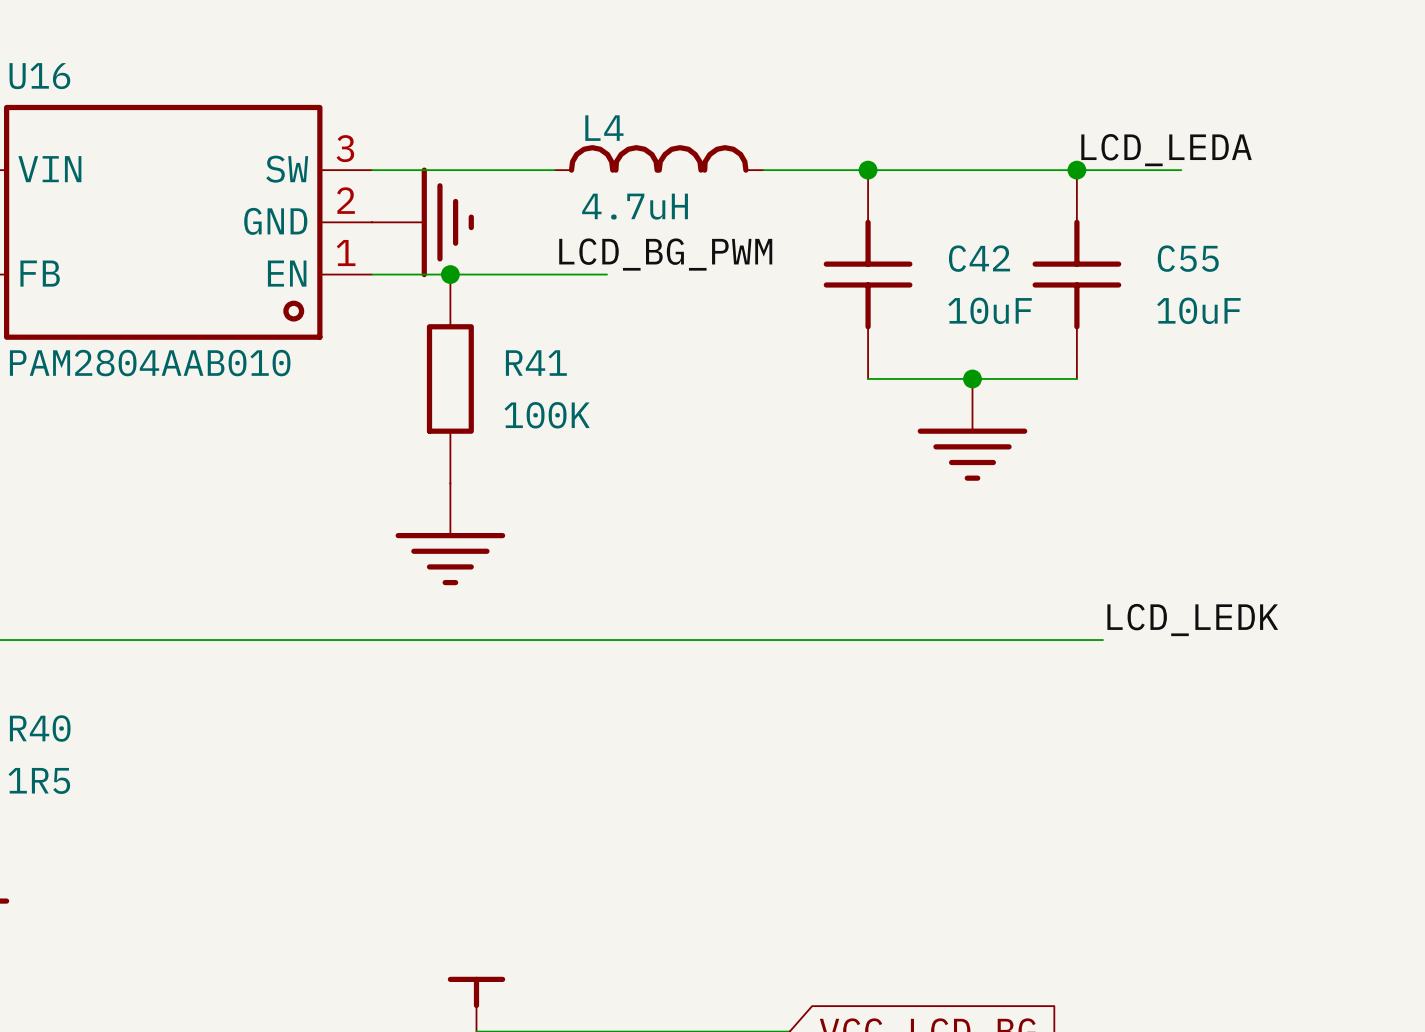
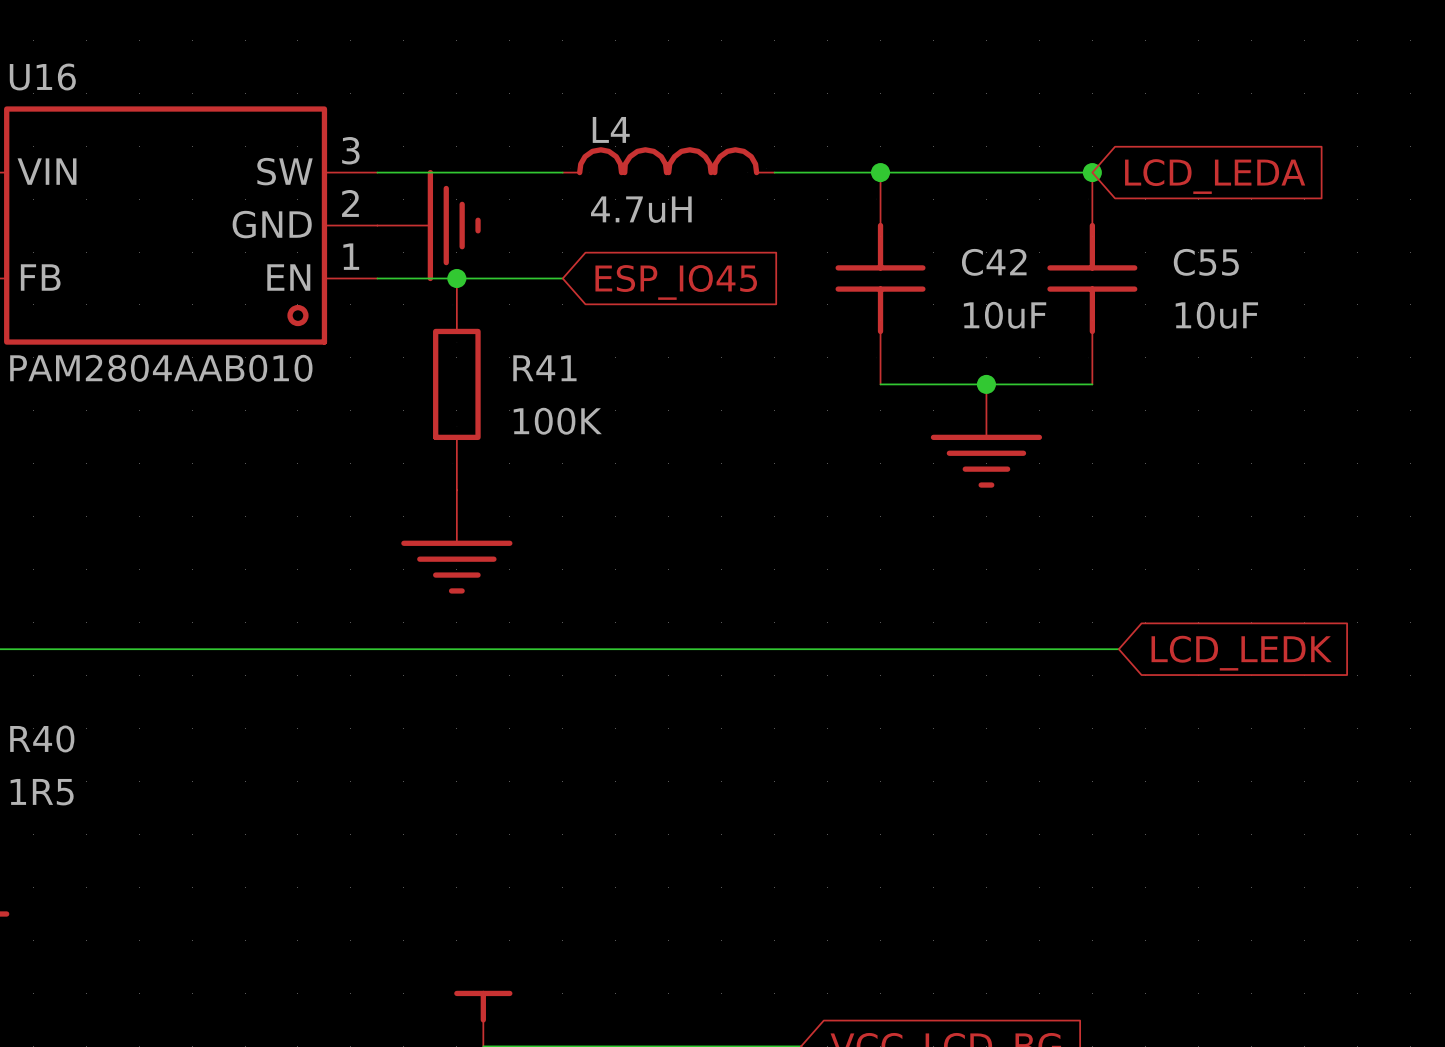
label: LCD_LEDA (1166, 150) -> none
wire: (1076, 170) (1181, 170) -> none
global label: none -> LCD_LEDA (1215, 176)
label: LCD_BG_PWM (665, 254) -> none
wire: (554, 274) (607, 274) -> none
global label: none -> ESP_IO45 (676, 282)
label: LCD_LEDK (1192, 620) -> none
global label: none -> LCD_LEDK (1241, 653)

